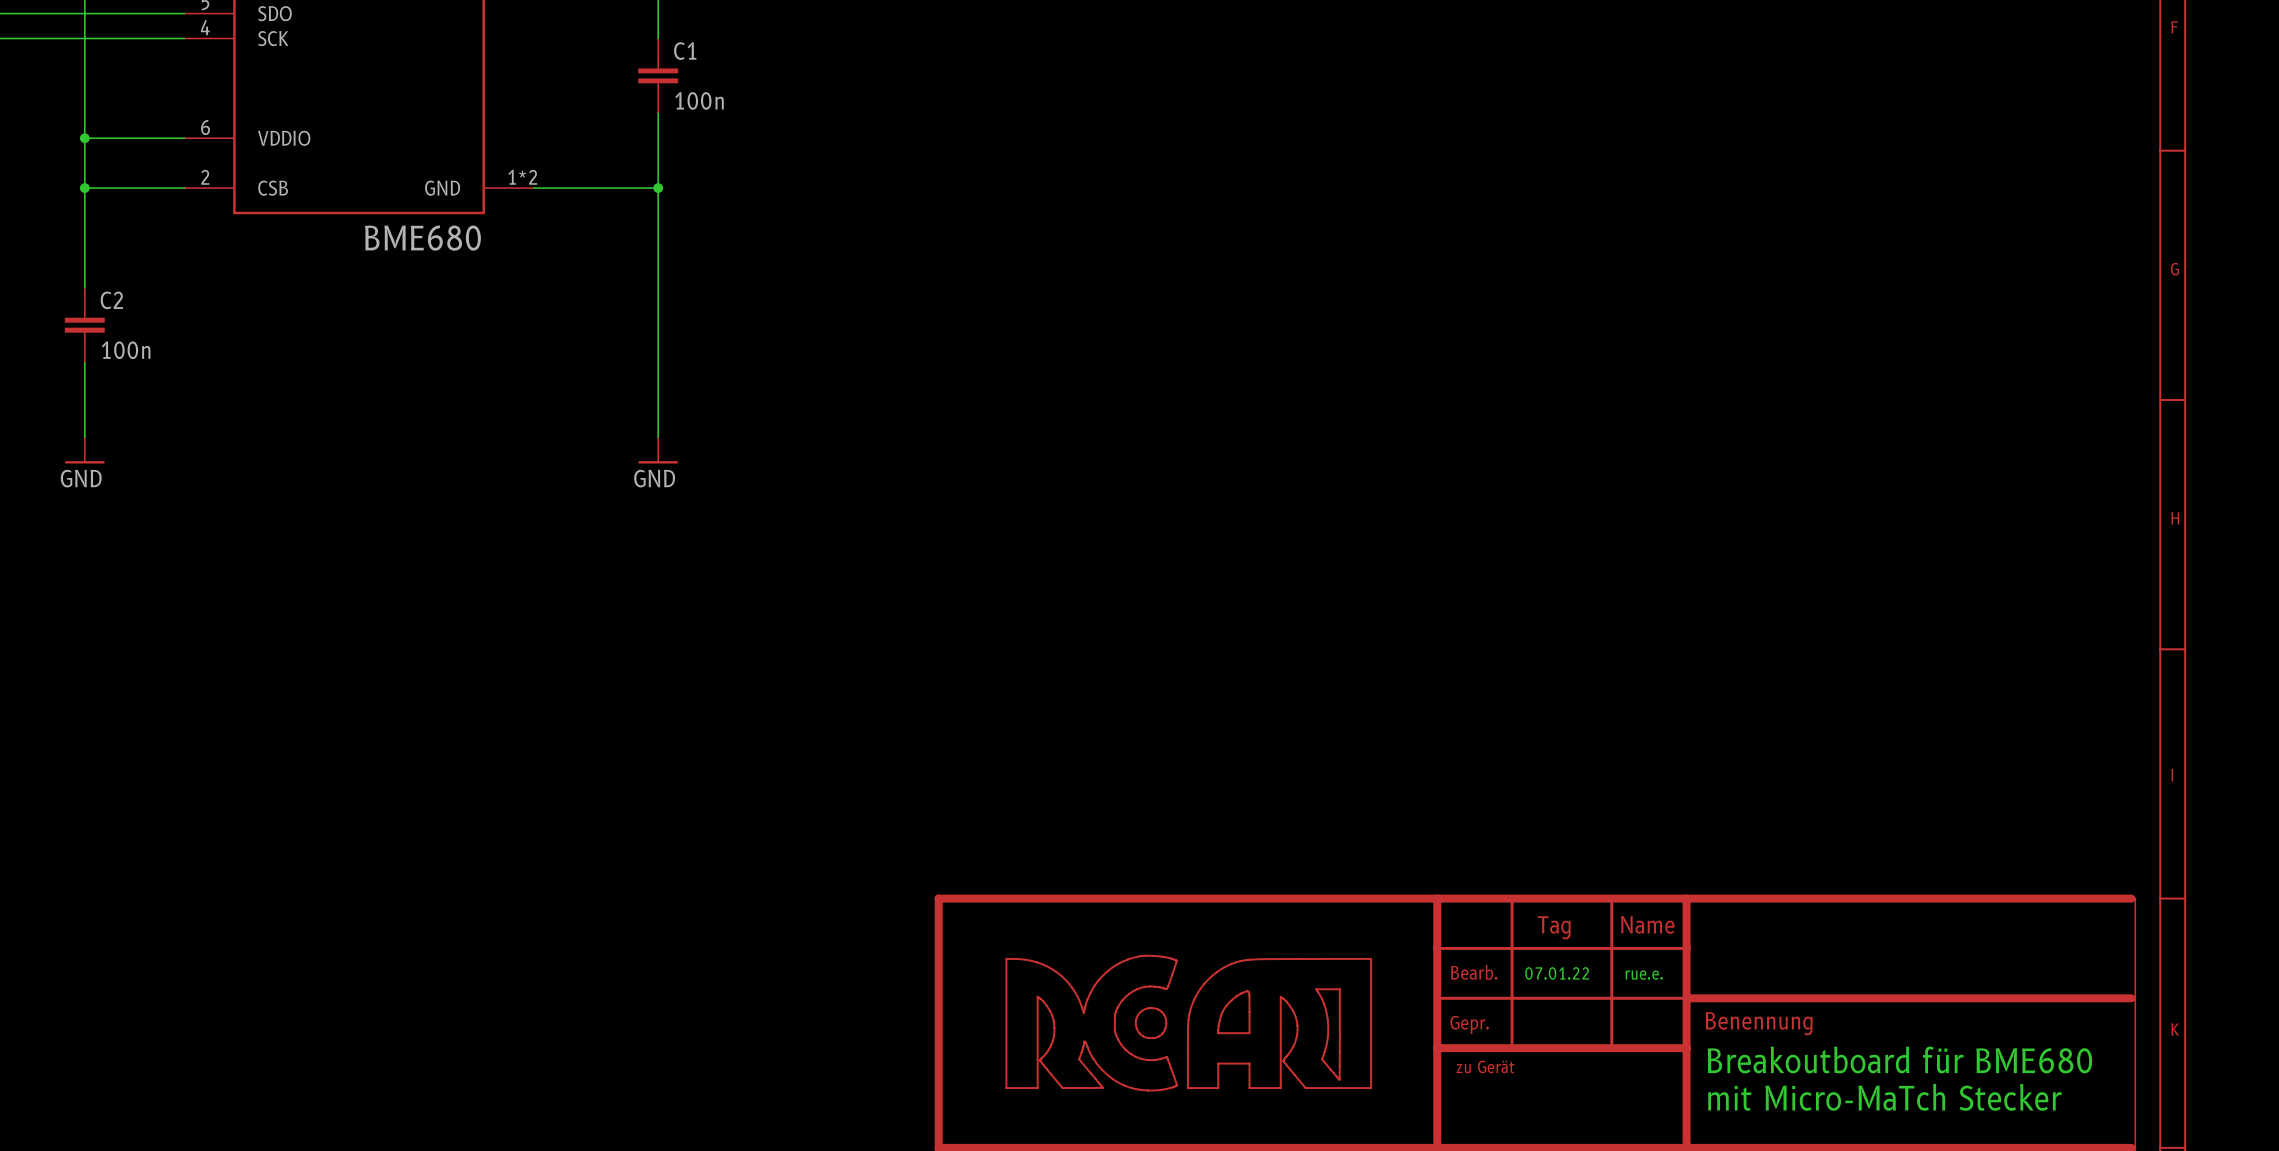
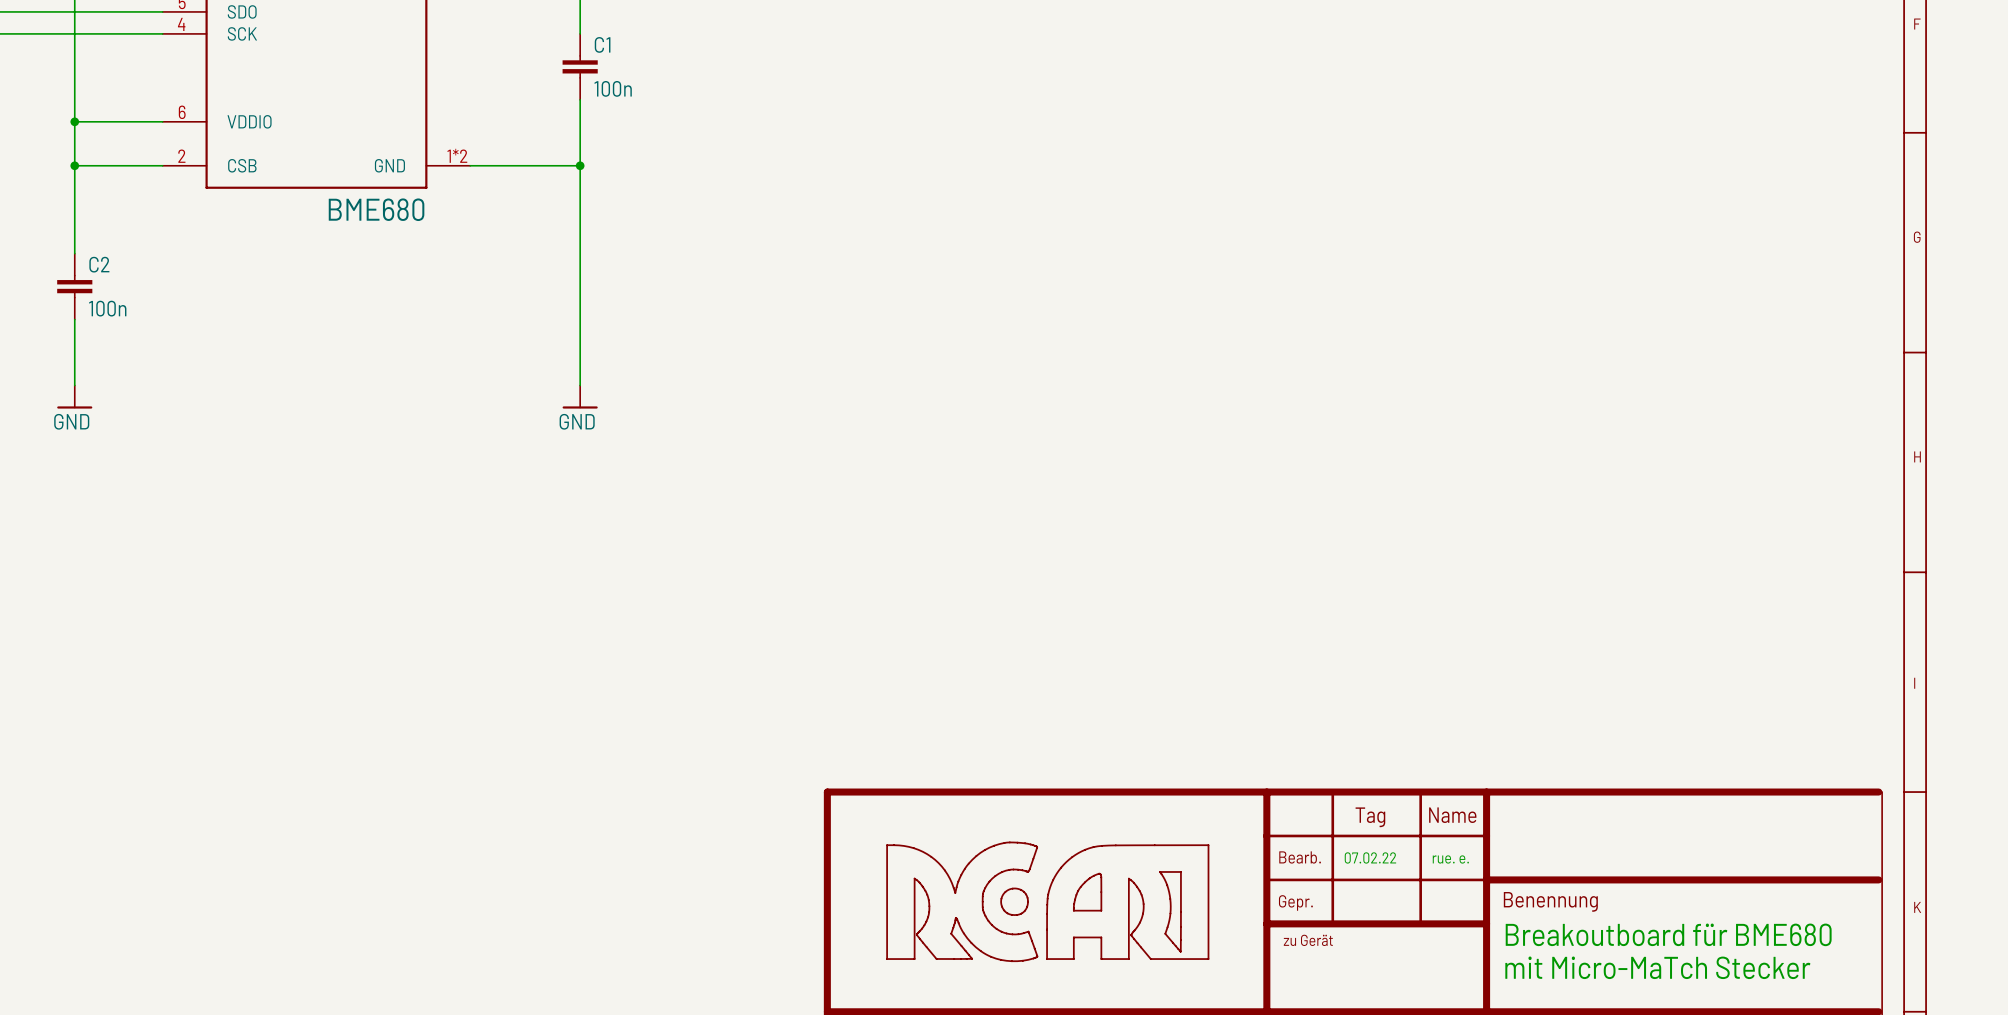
text: 07.01.22 (1557, 973) -> 07.02.22 (1370, 857)
text: rue.e. (1644, 975) -> rue. e. (1450, 859)

